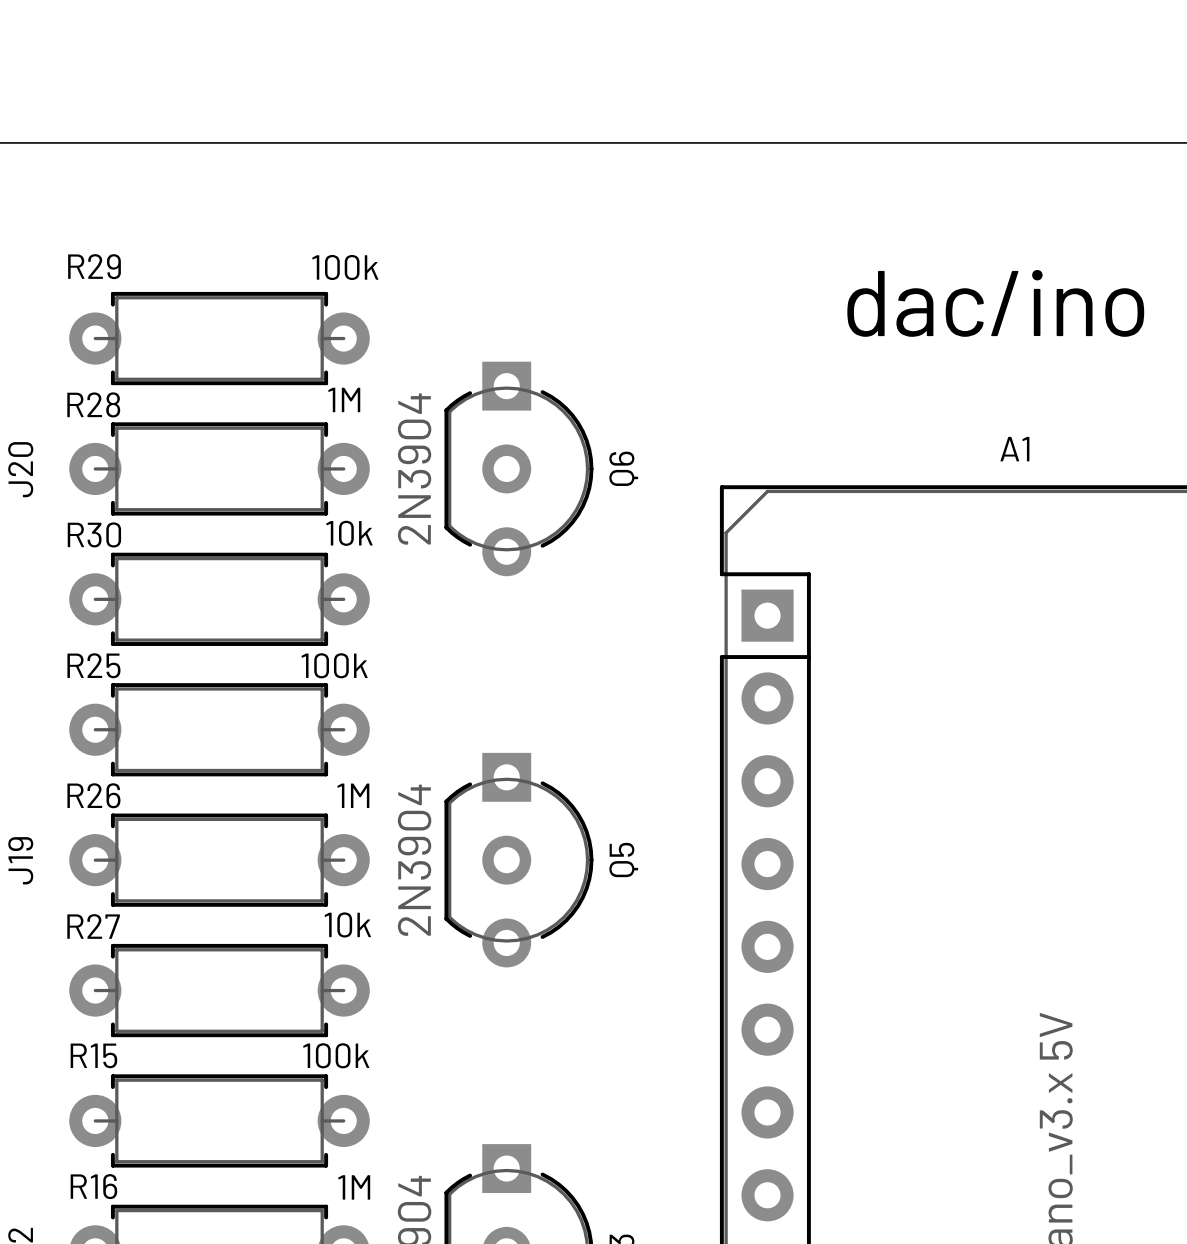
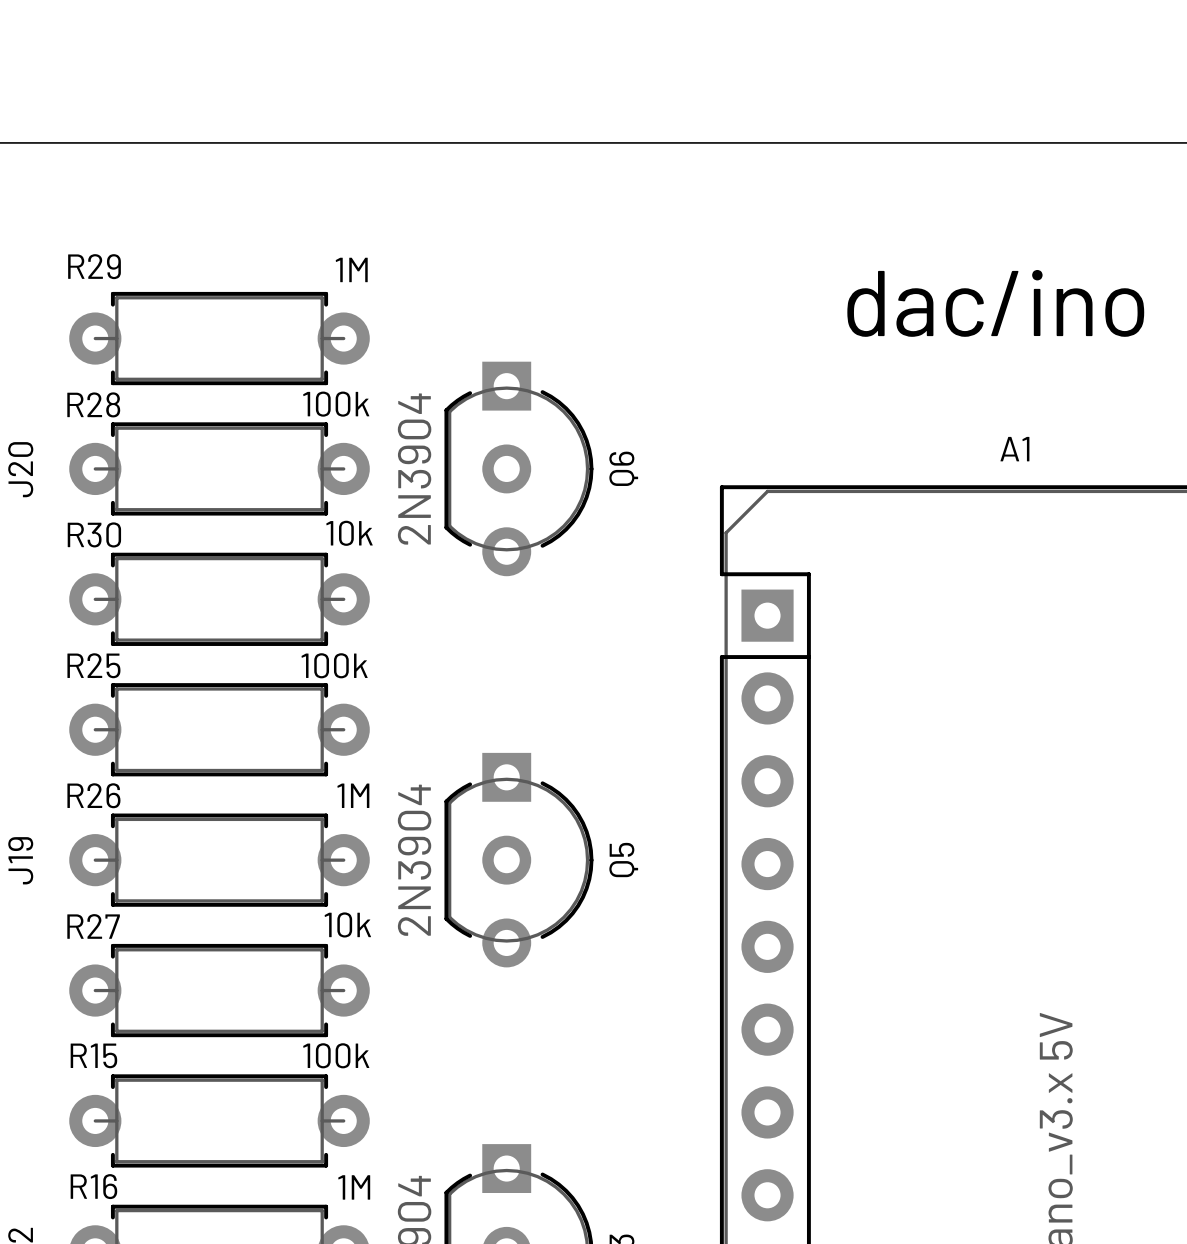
R28 value position: 100k (345, 267) -> 100k (336, 404)
R29 value position: 1M (344, 399) -> 1M (351, 269)

